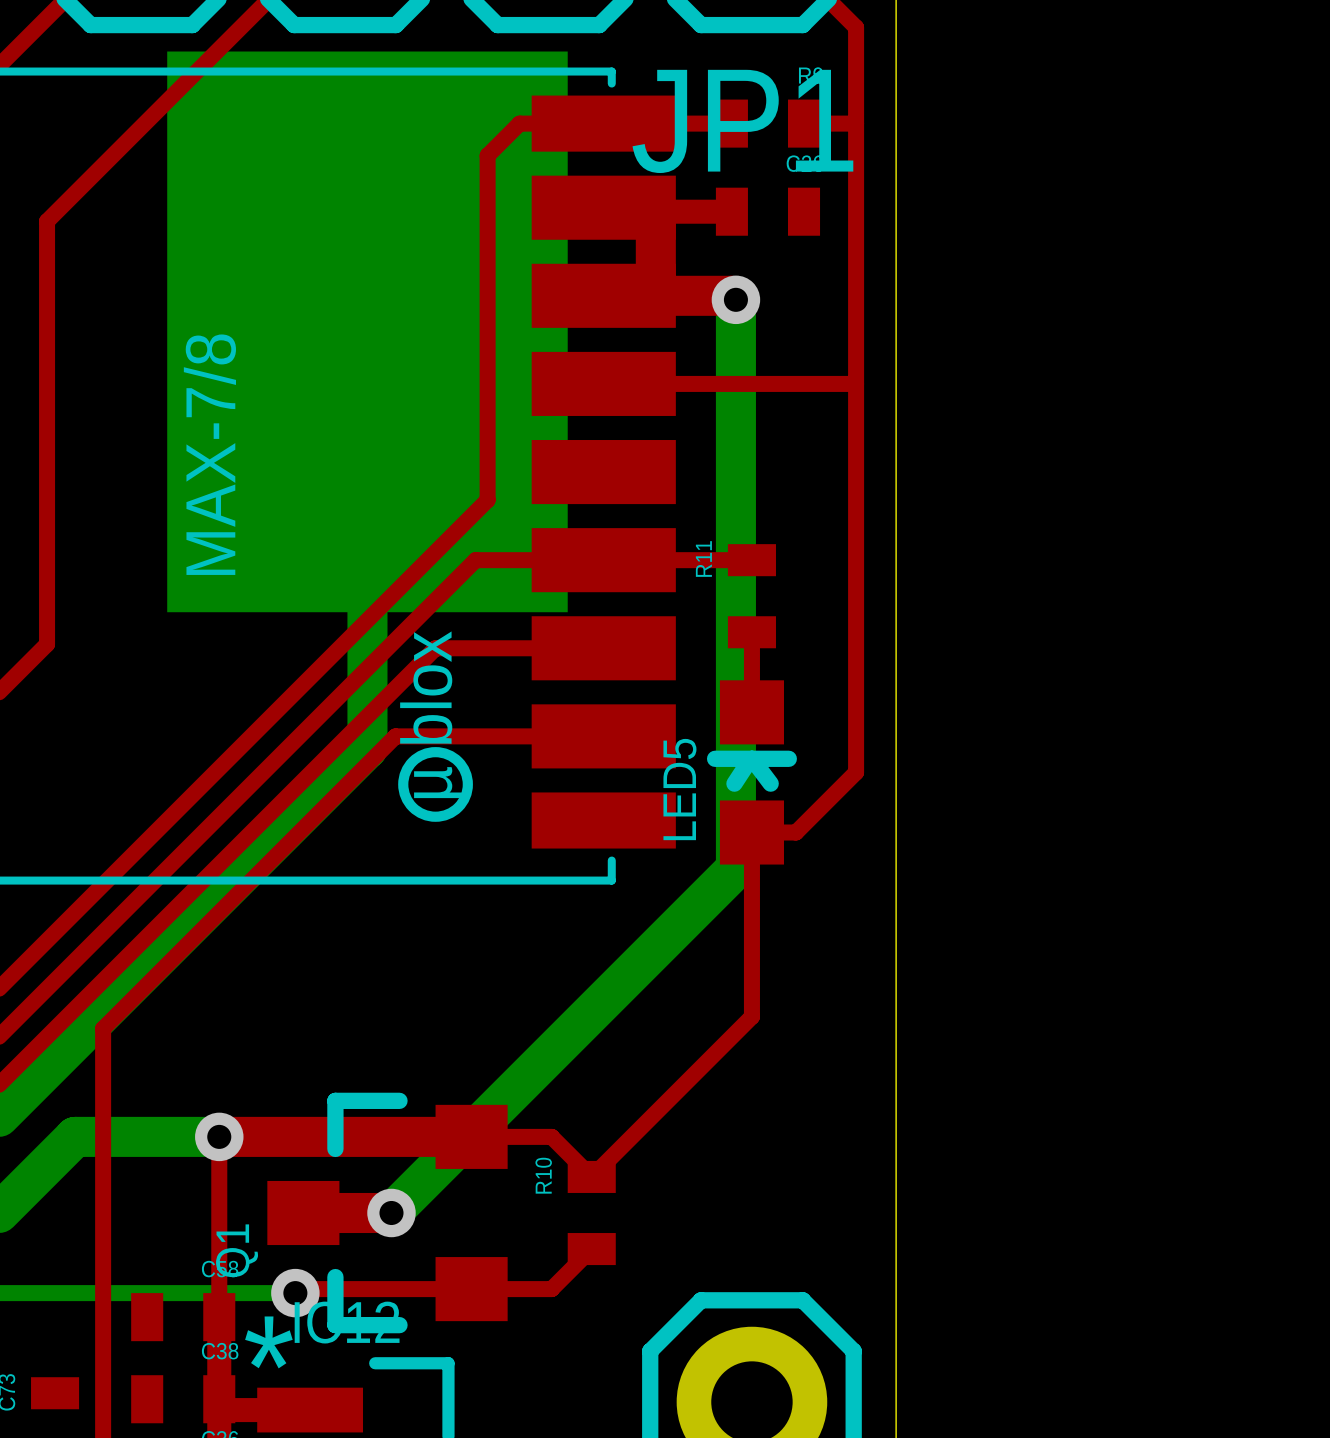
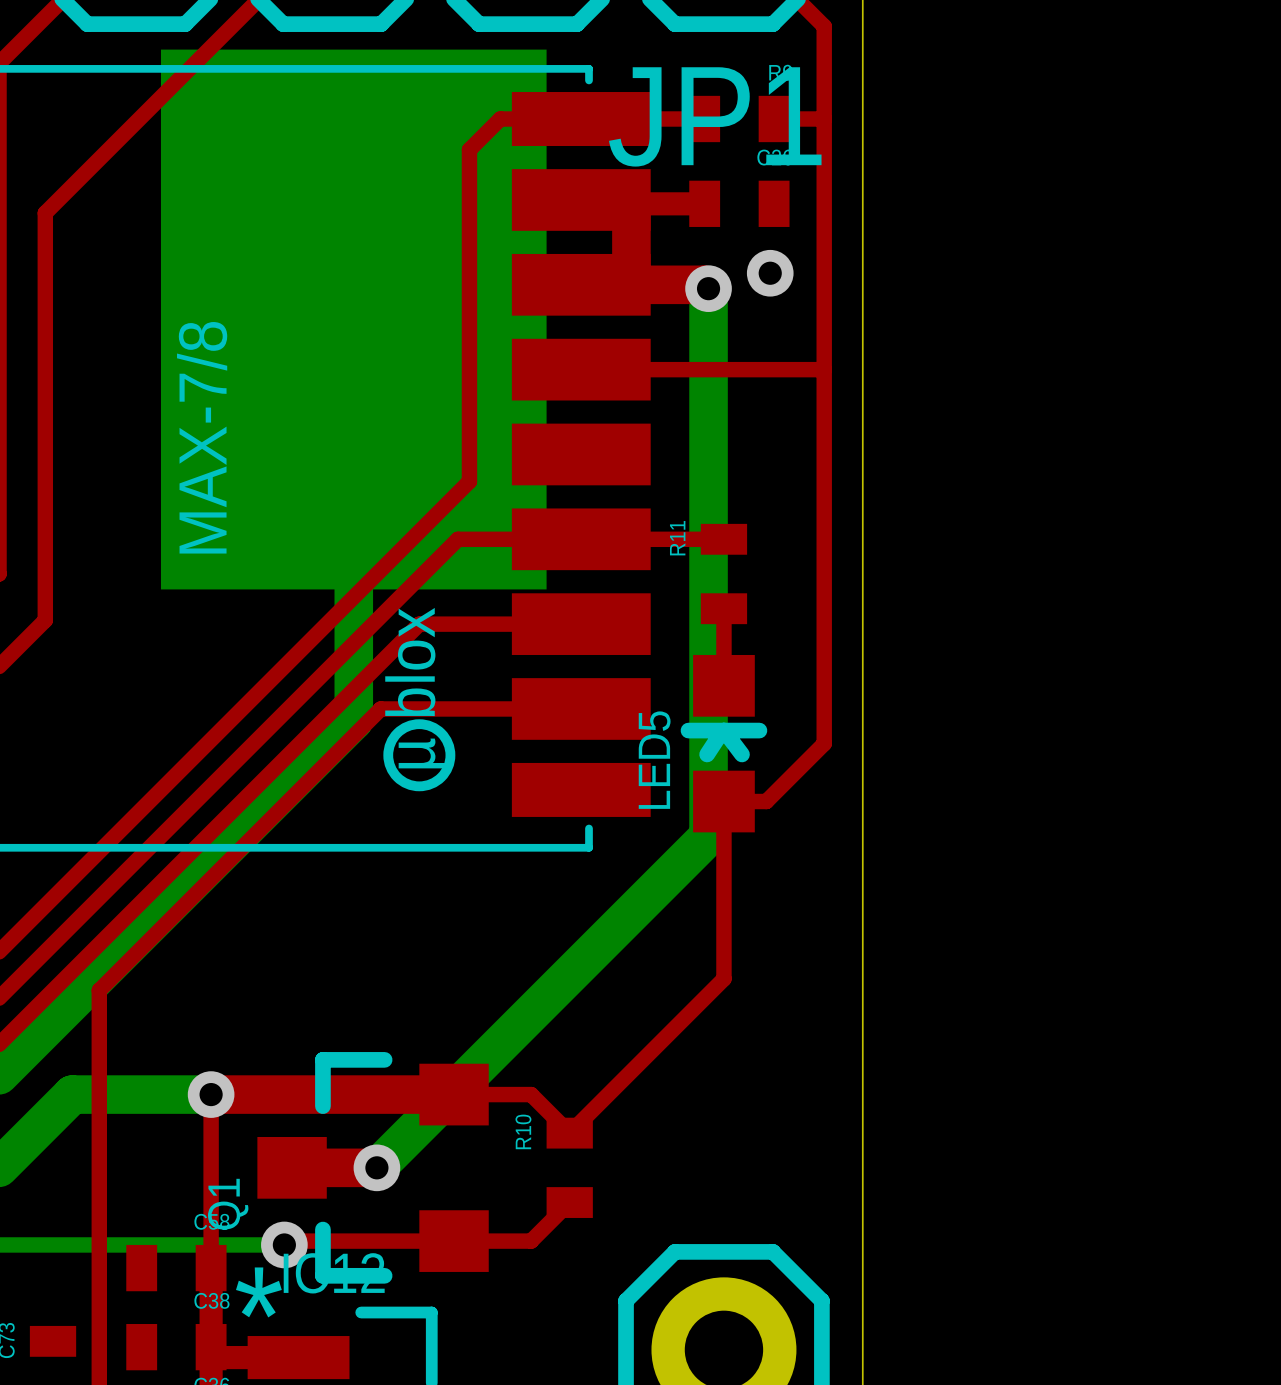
via: none -> (770, 273)

